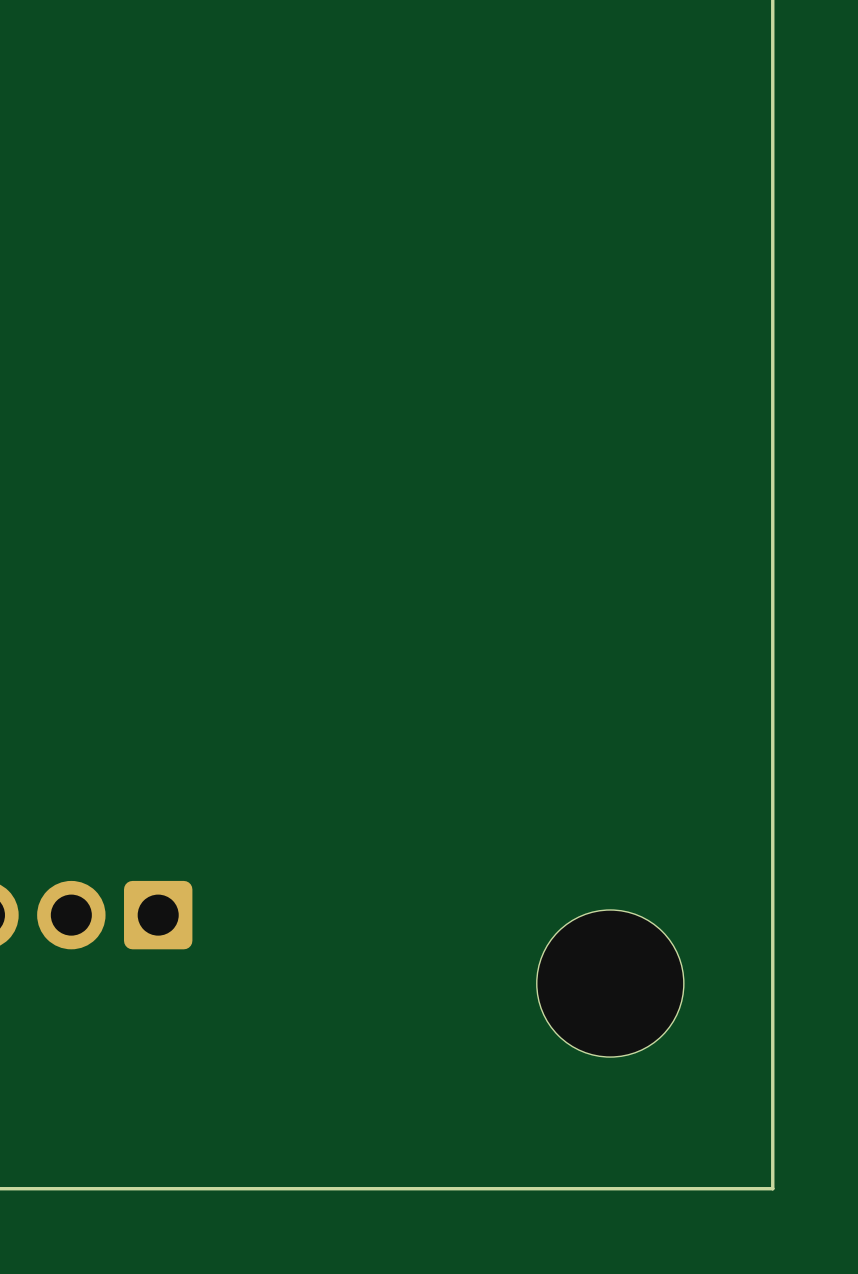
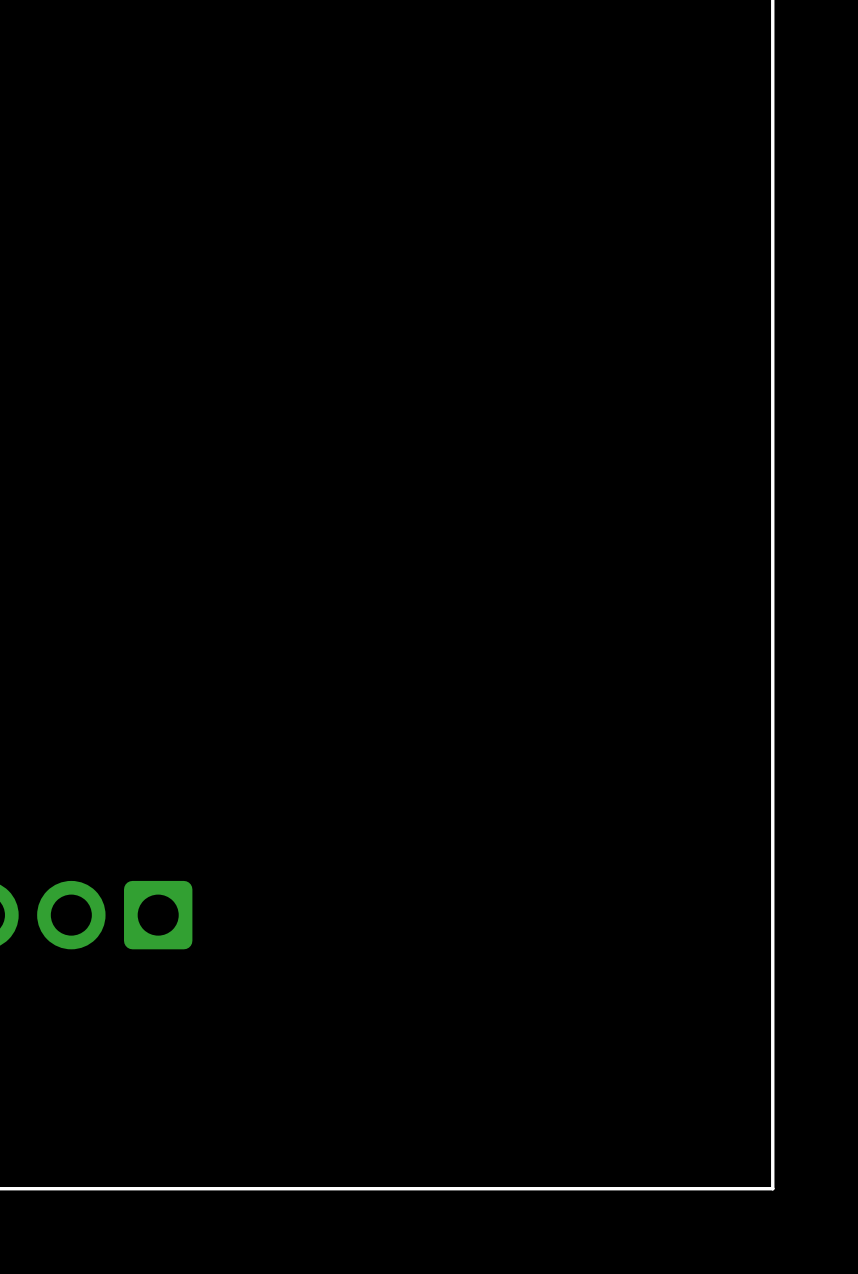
part: (610, 983) -> none

